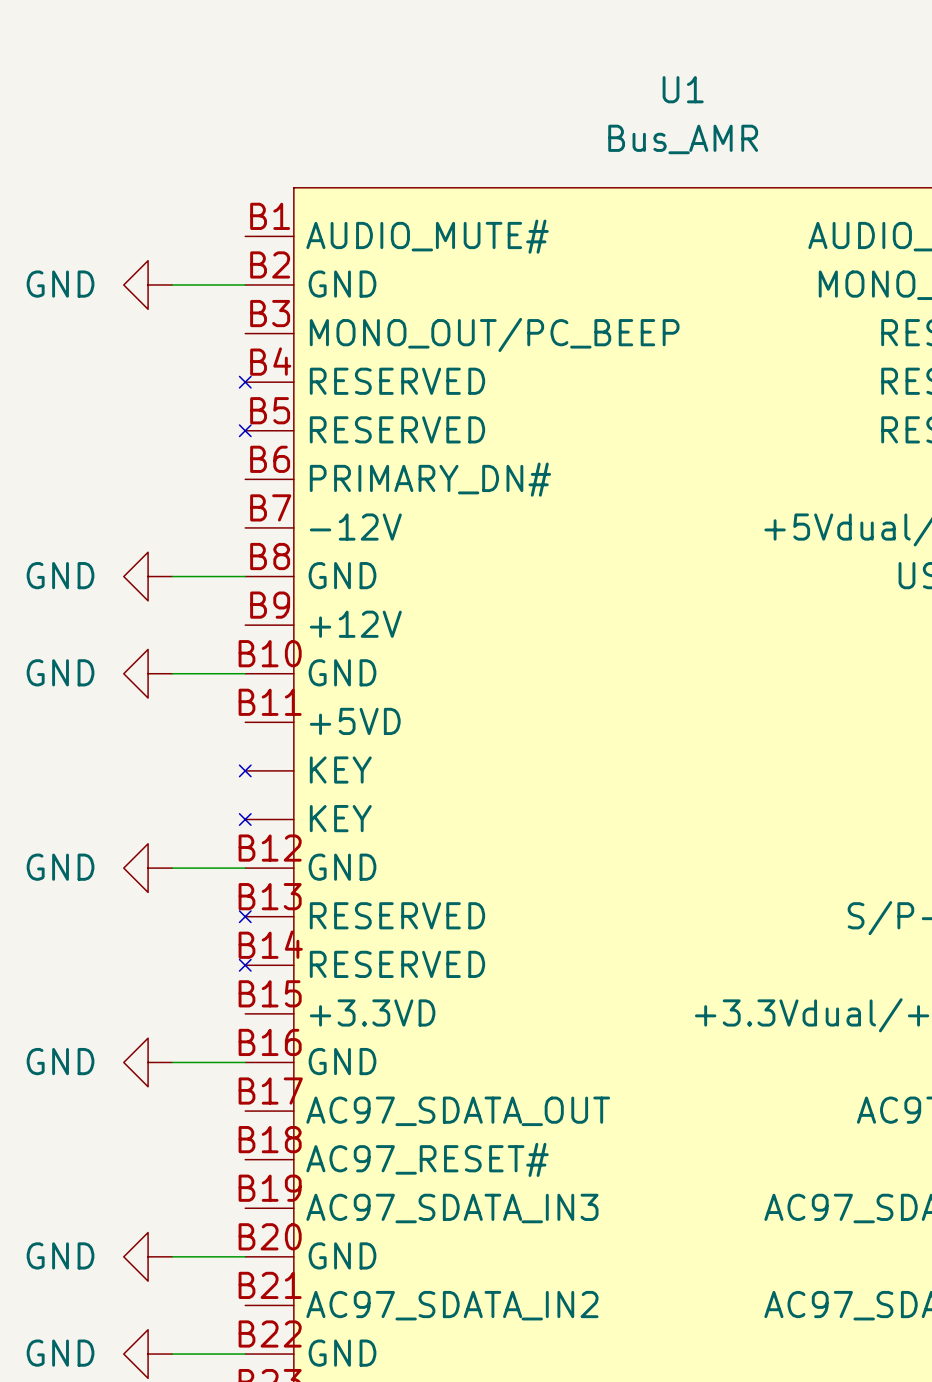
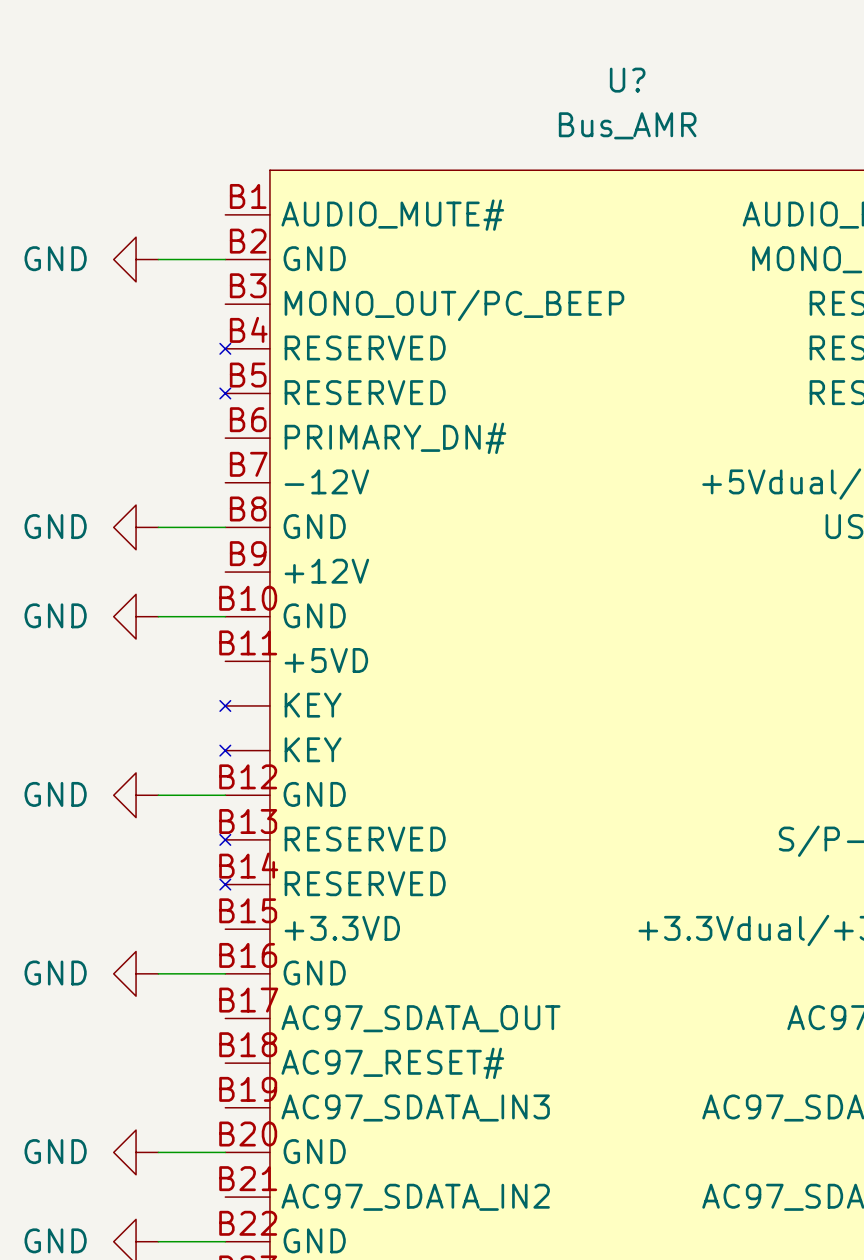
U1 name: U1 (683, 89) -> U? (627, 80)

